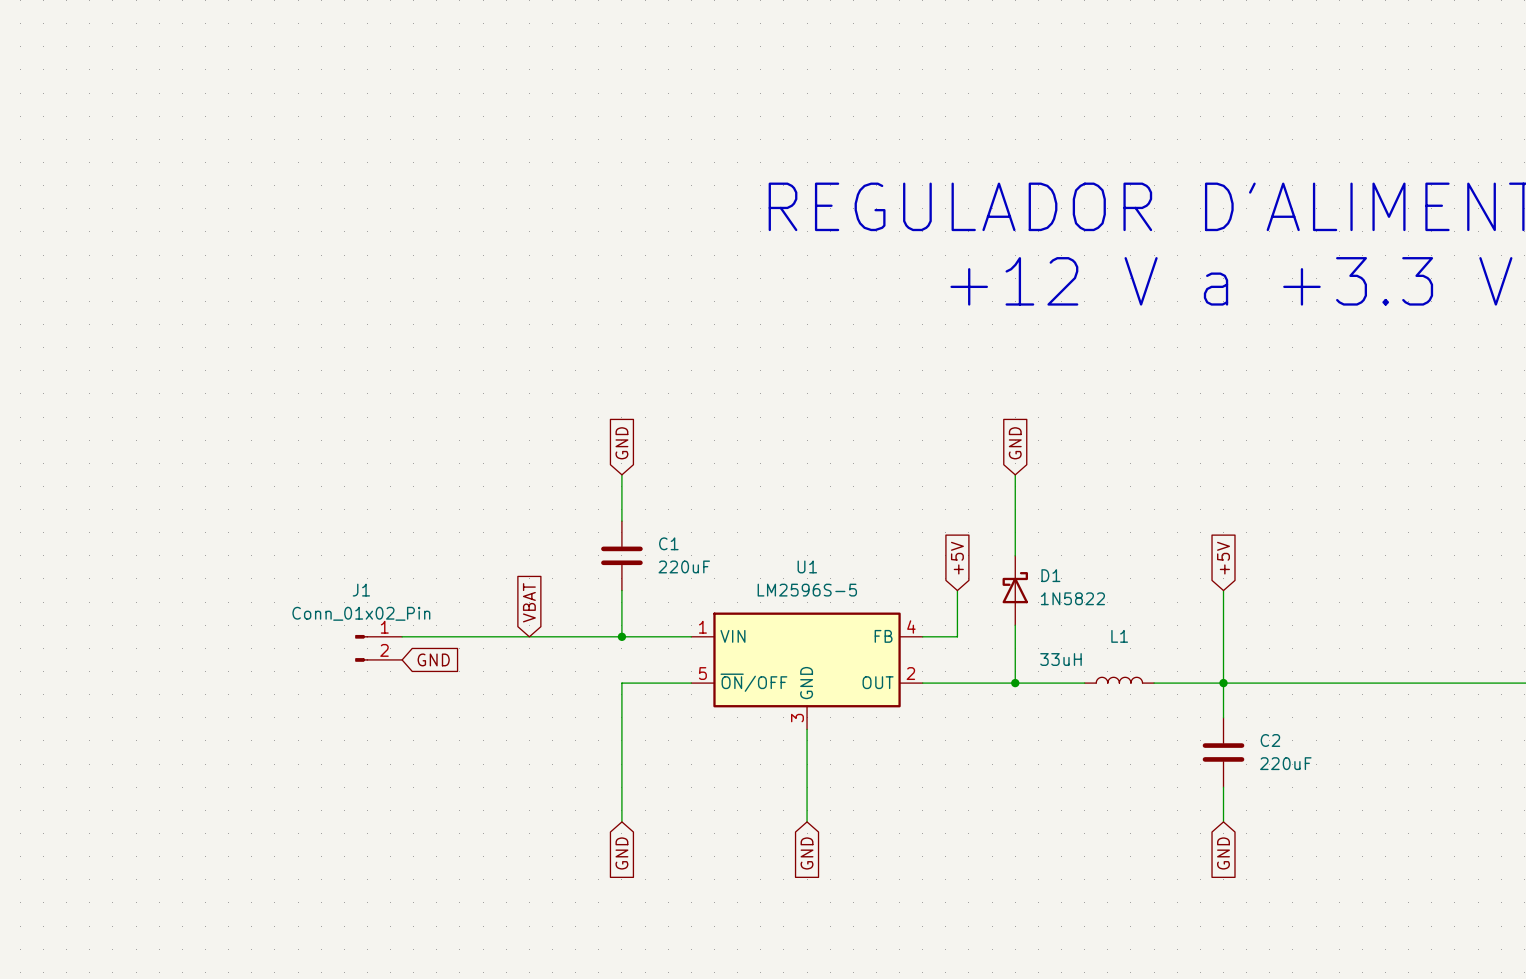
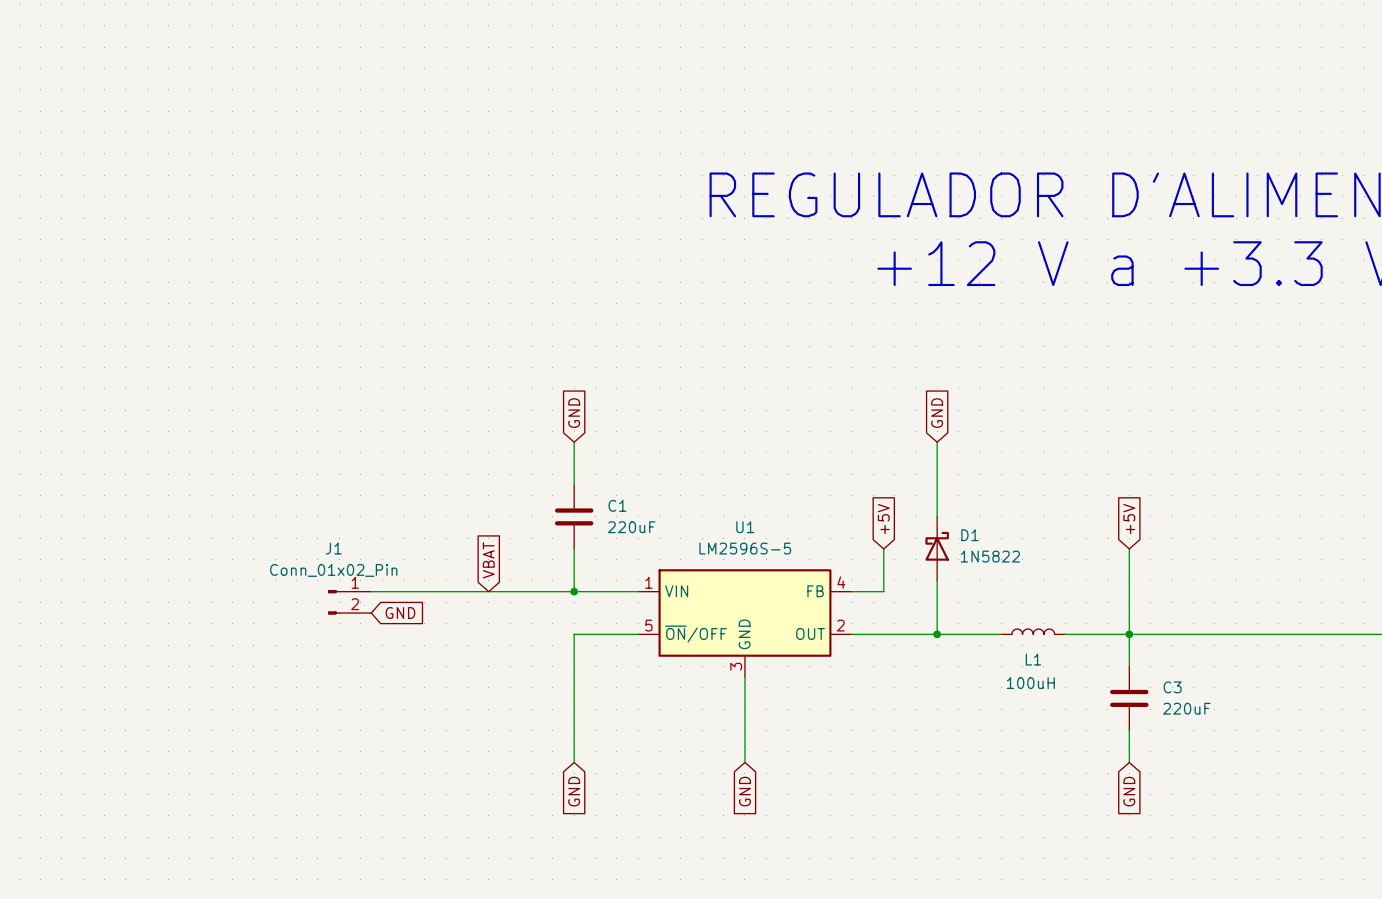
L1 name position: L1 (1119, 636) -> L1 (1033, 659)
L1 value: 33uH (1060, 659) -> 100uH (1030, 683)
C2 name: C2 (1270, 740) -> C3 (1172, 687)

